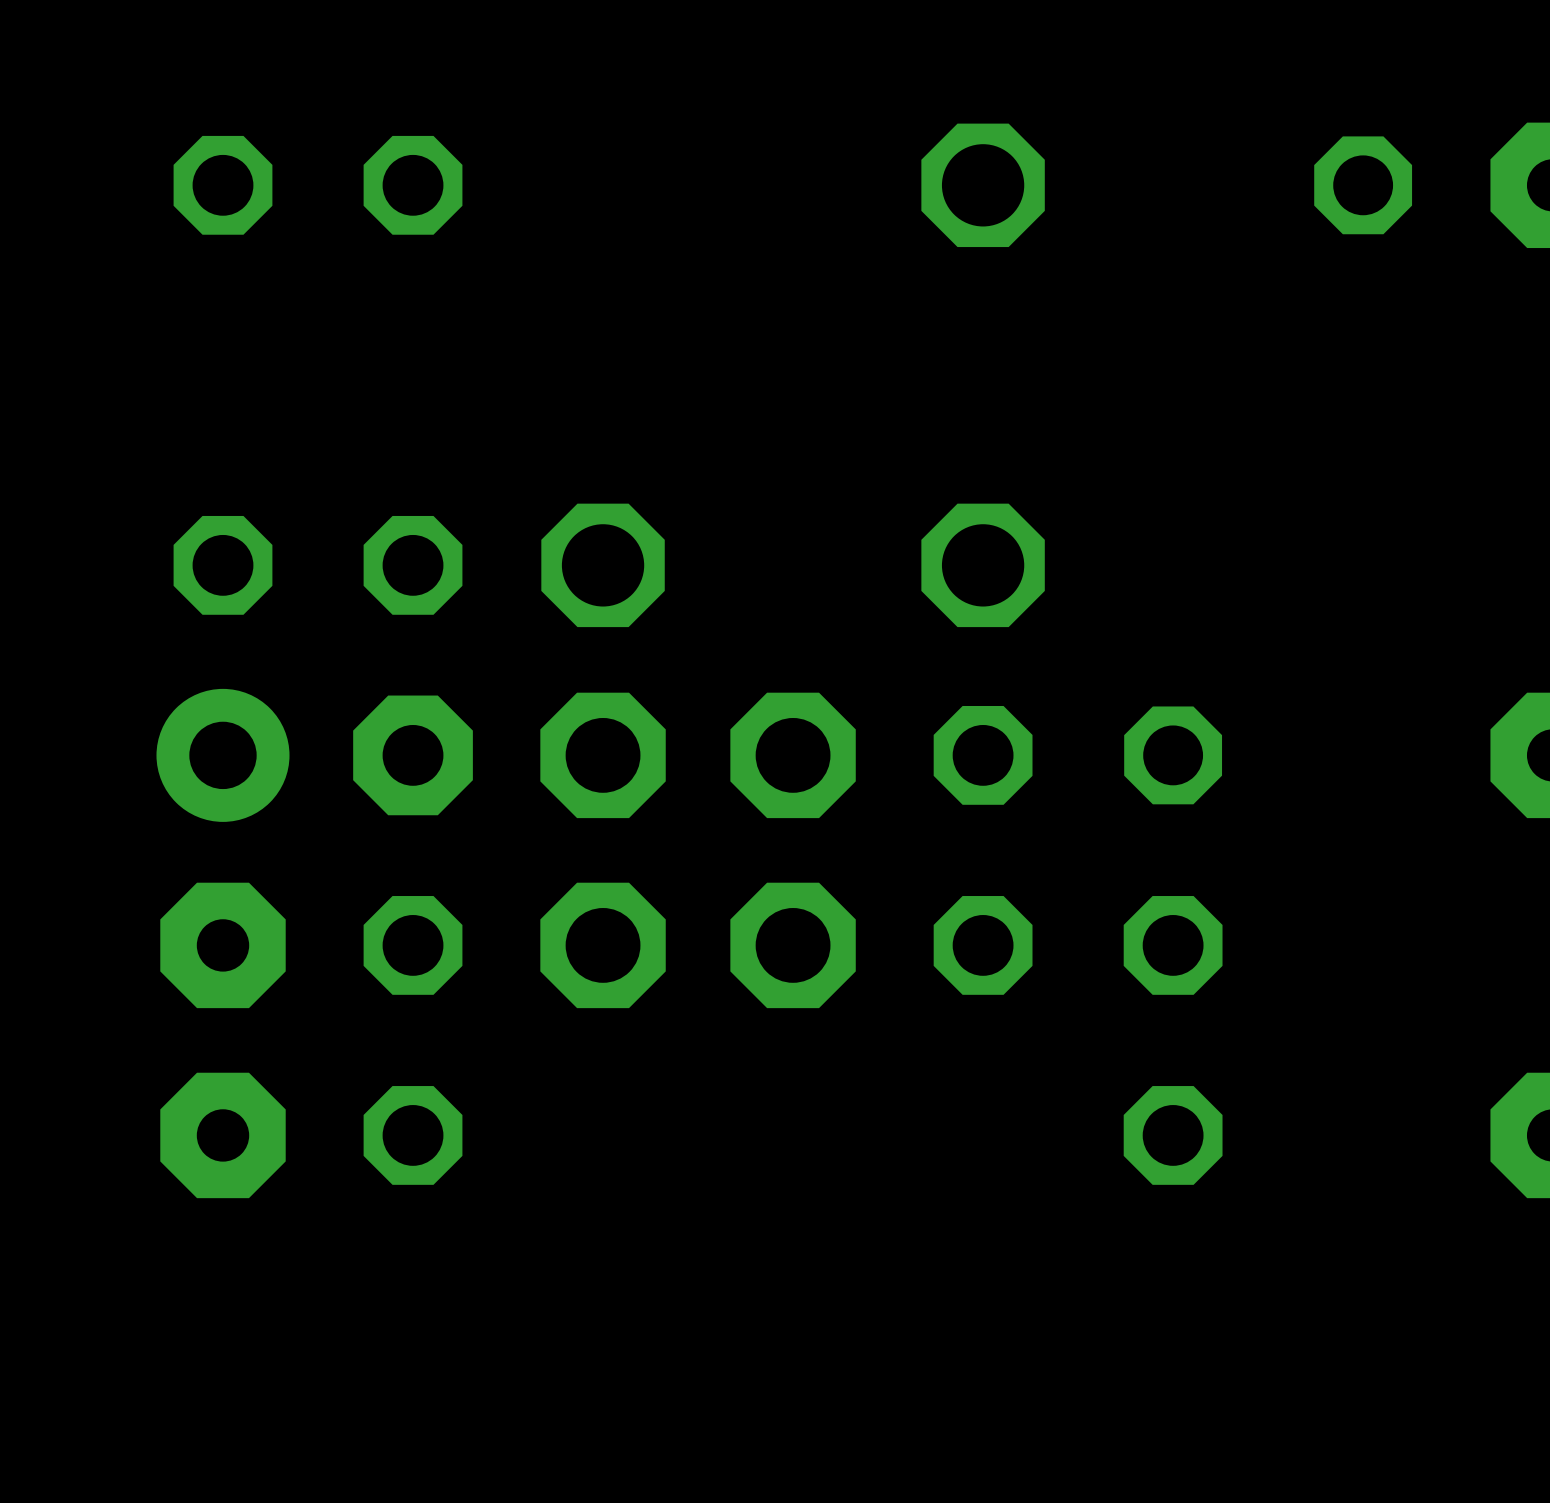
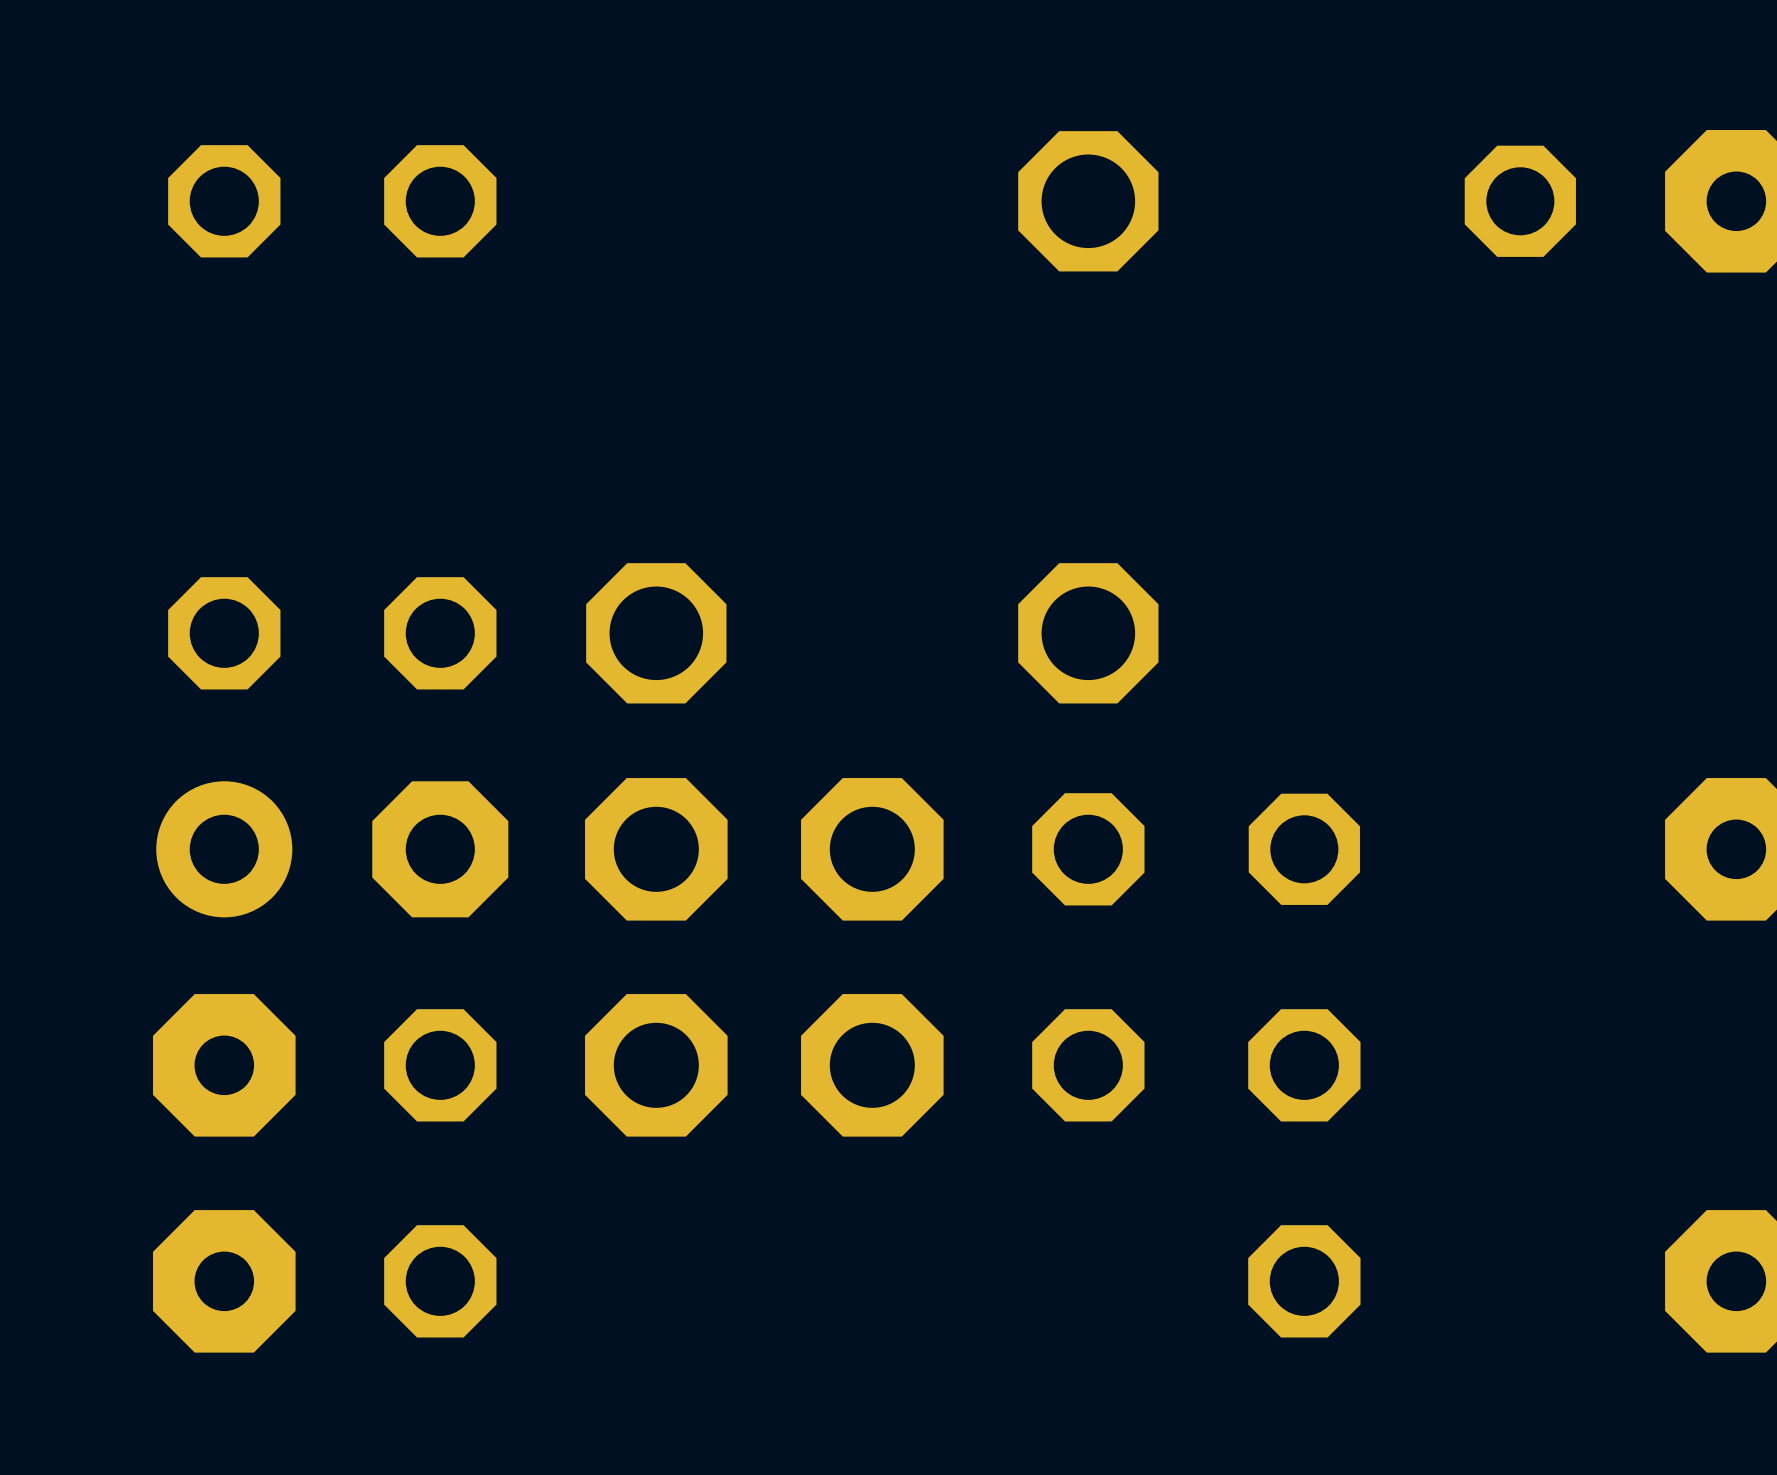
part footprint: [156, 688, 473, 822] -> [156, 781, 509, 918]

